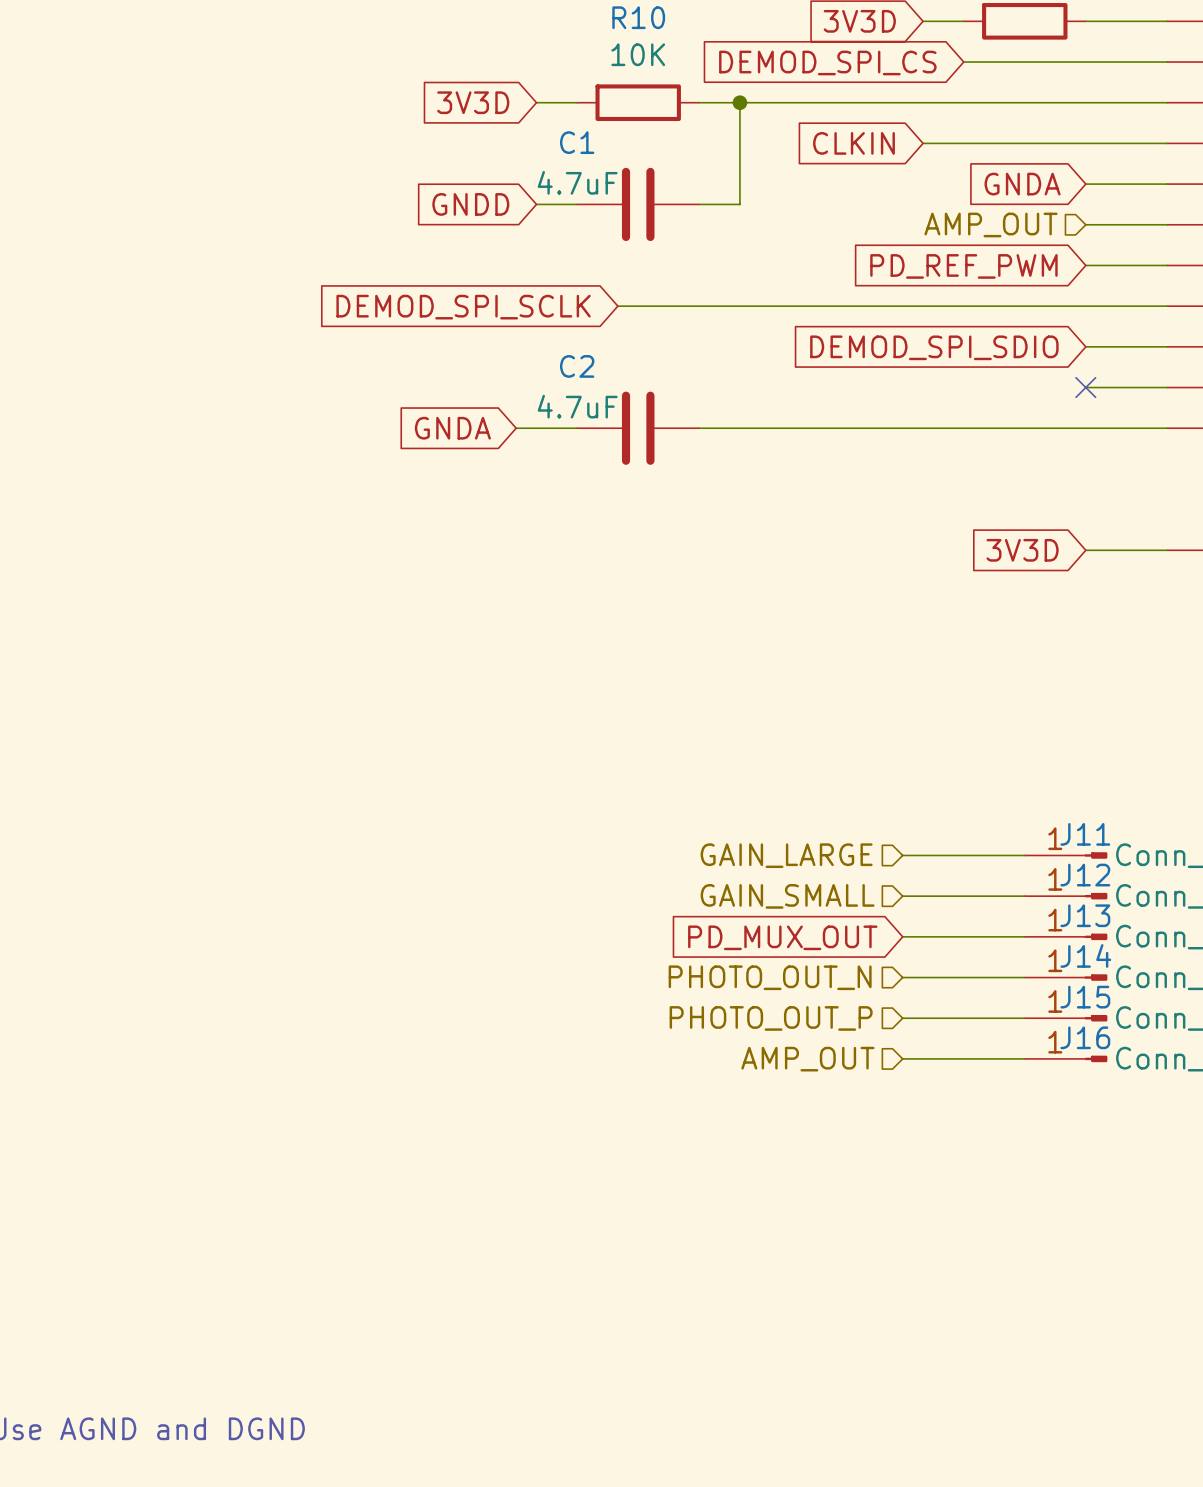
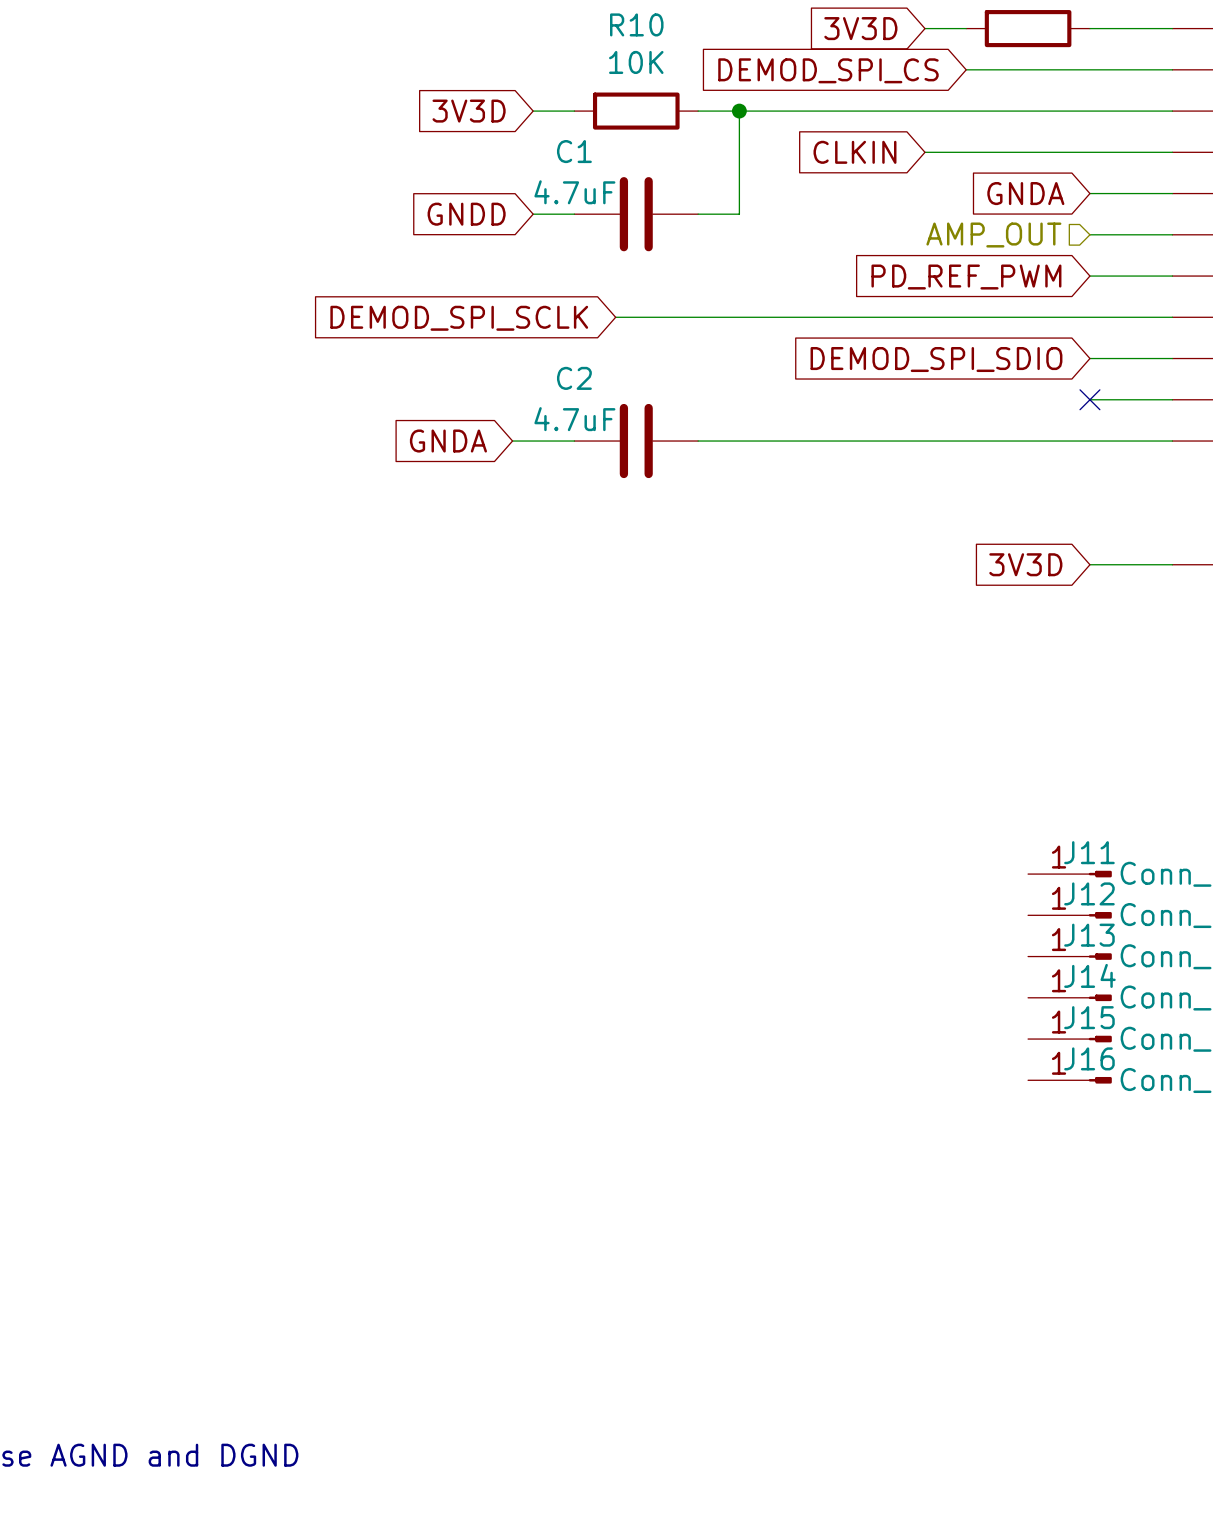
hierarchical label: GAIN_LARGE (786, 855) -> none
wire: (902, 855) (1024, 855) -> none
hierarchical label: GAIN_SMALL (787, 896) -> none
wire: (902, 896) (1024, 896) -> none
wire: (902, 936) (1024, 936) -> none
global label: PD_MUX_OUT (782, 937) -> none
hierarchical label: PHOTO_OUT_N (770, 977) -> none
wire: (902, 977) (1024, 977) -> none
hierarchical label: PHOTO_OUT_P (771, 1018) -> none
wire: (902, 1018) (1024, 1018) -> none
wire: (902, 1058) (1024, 1058) -> none
hierarchical label: AMP_OUT (807, 1059) -> none

